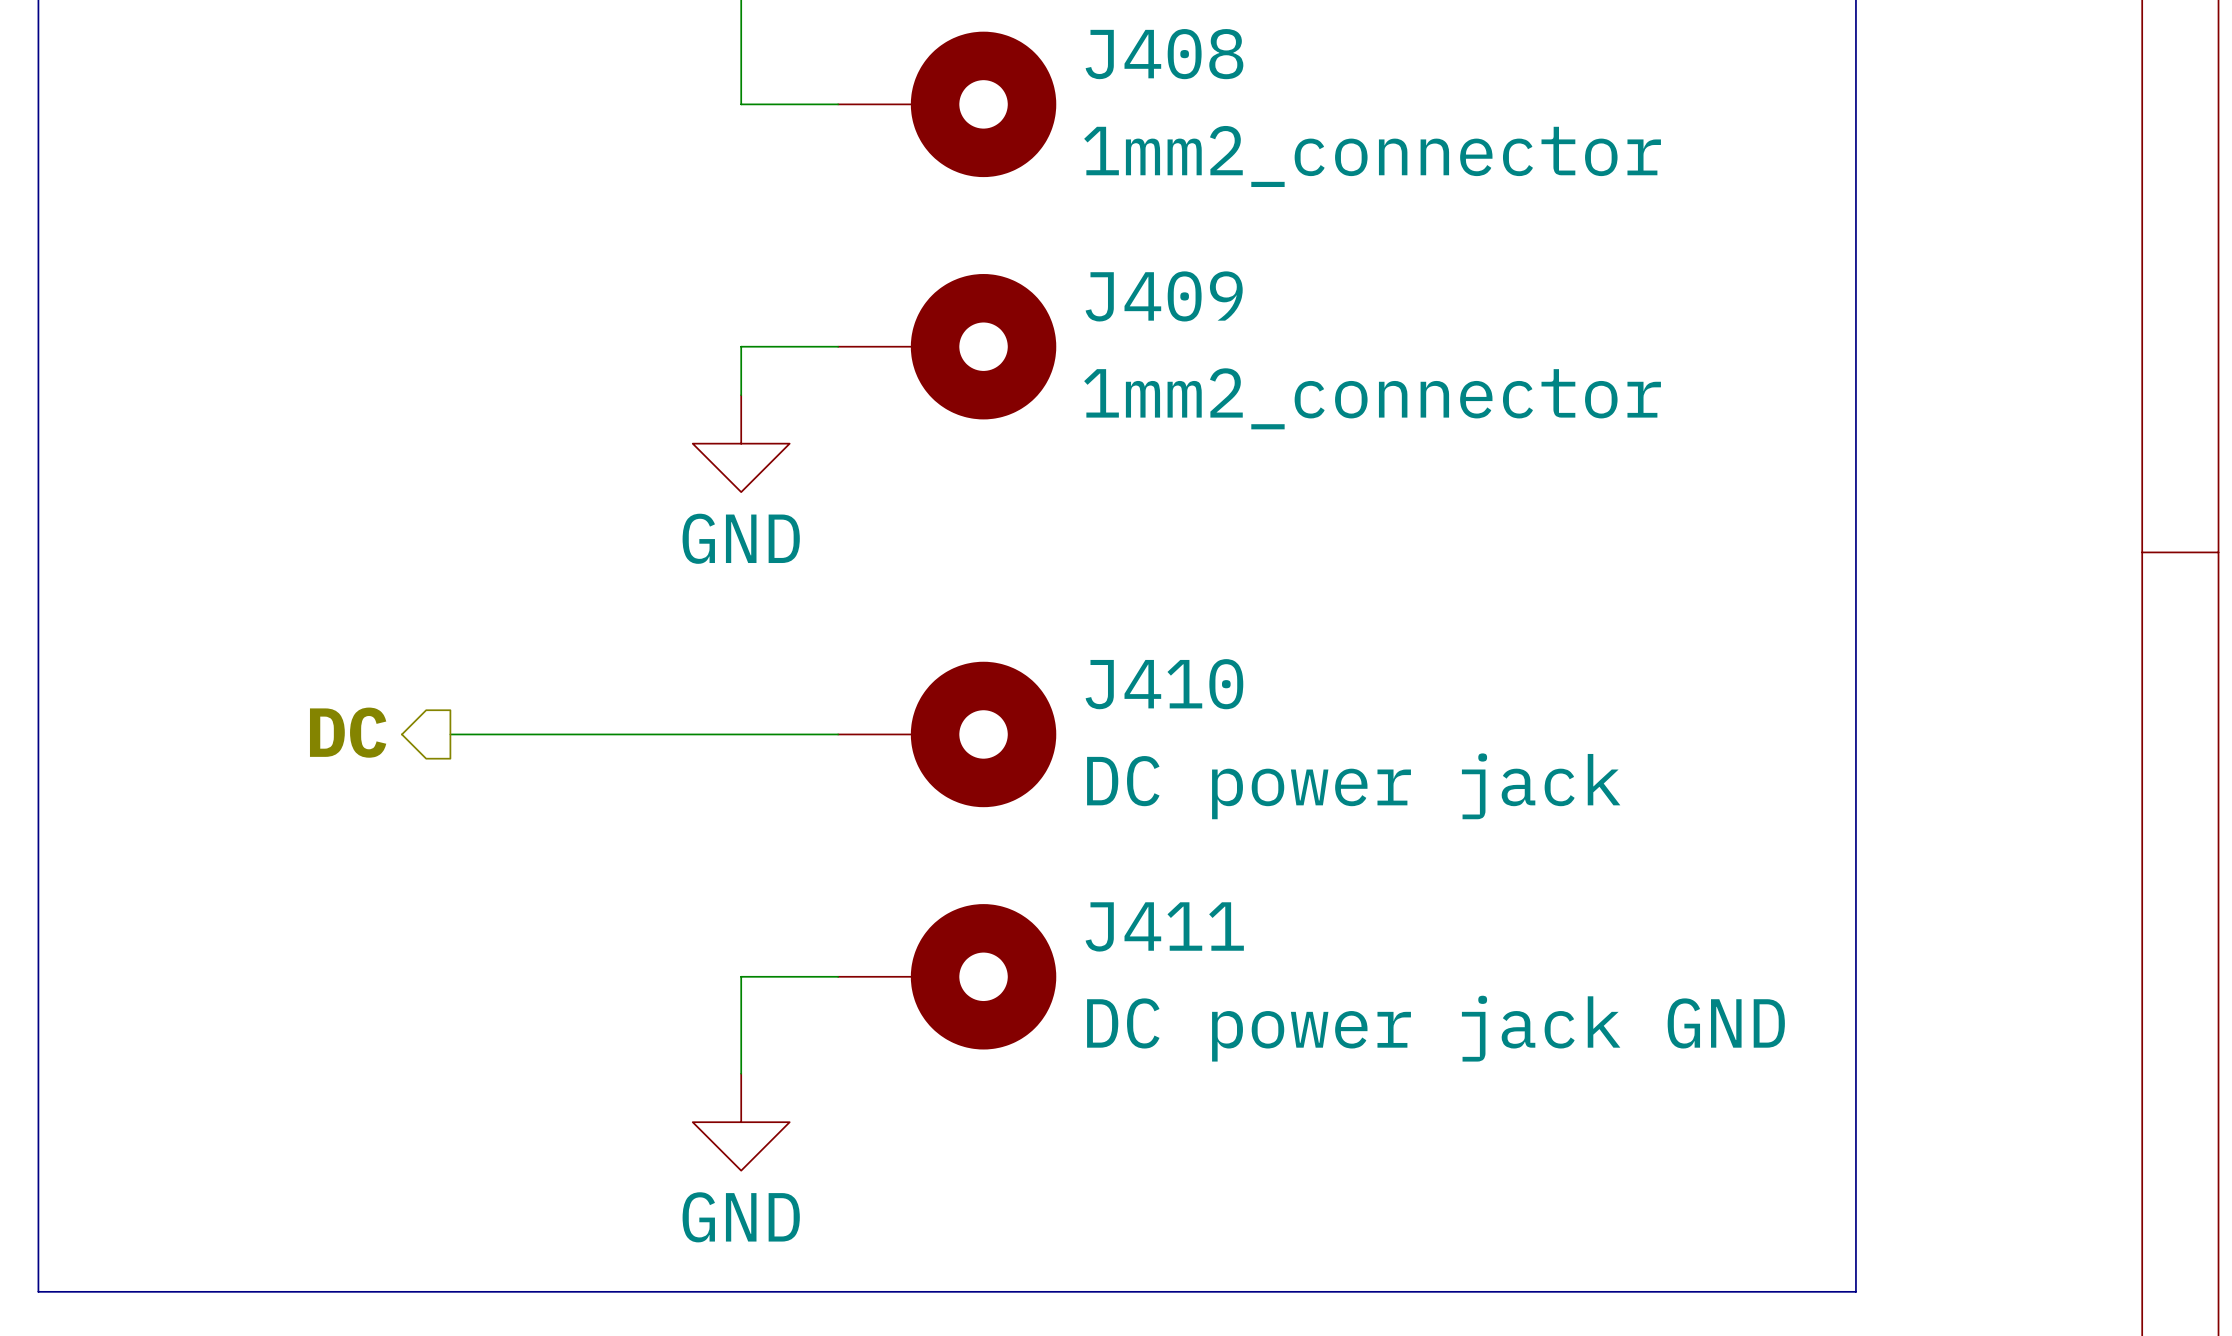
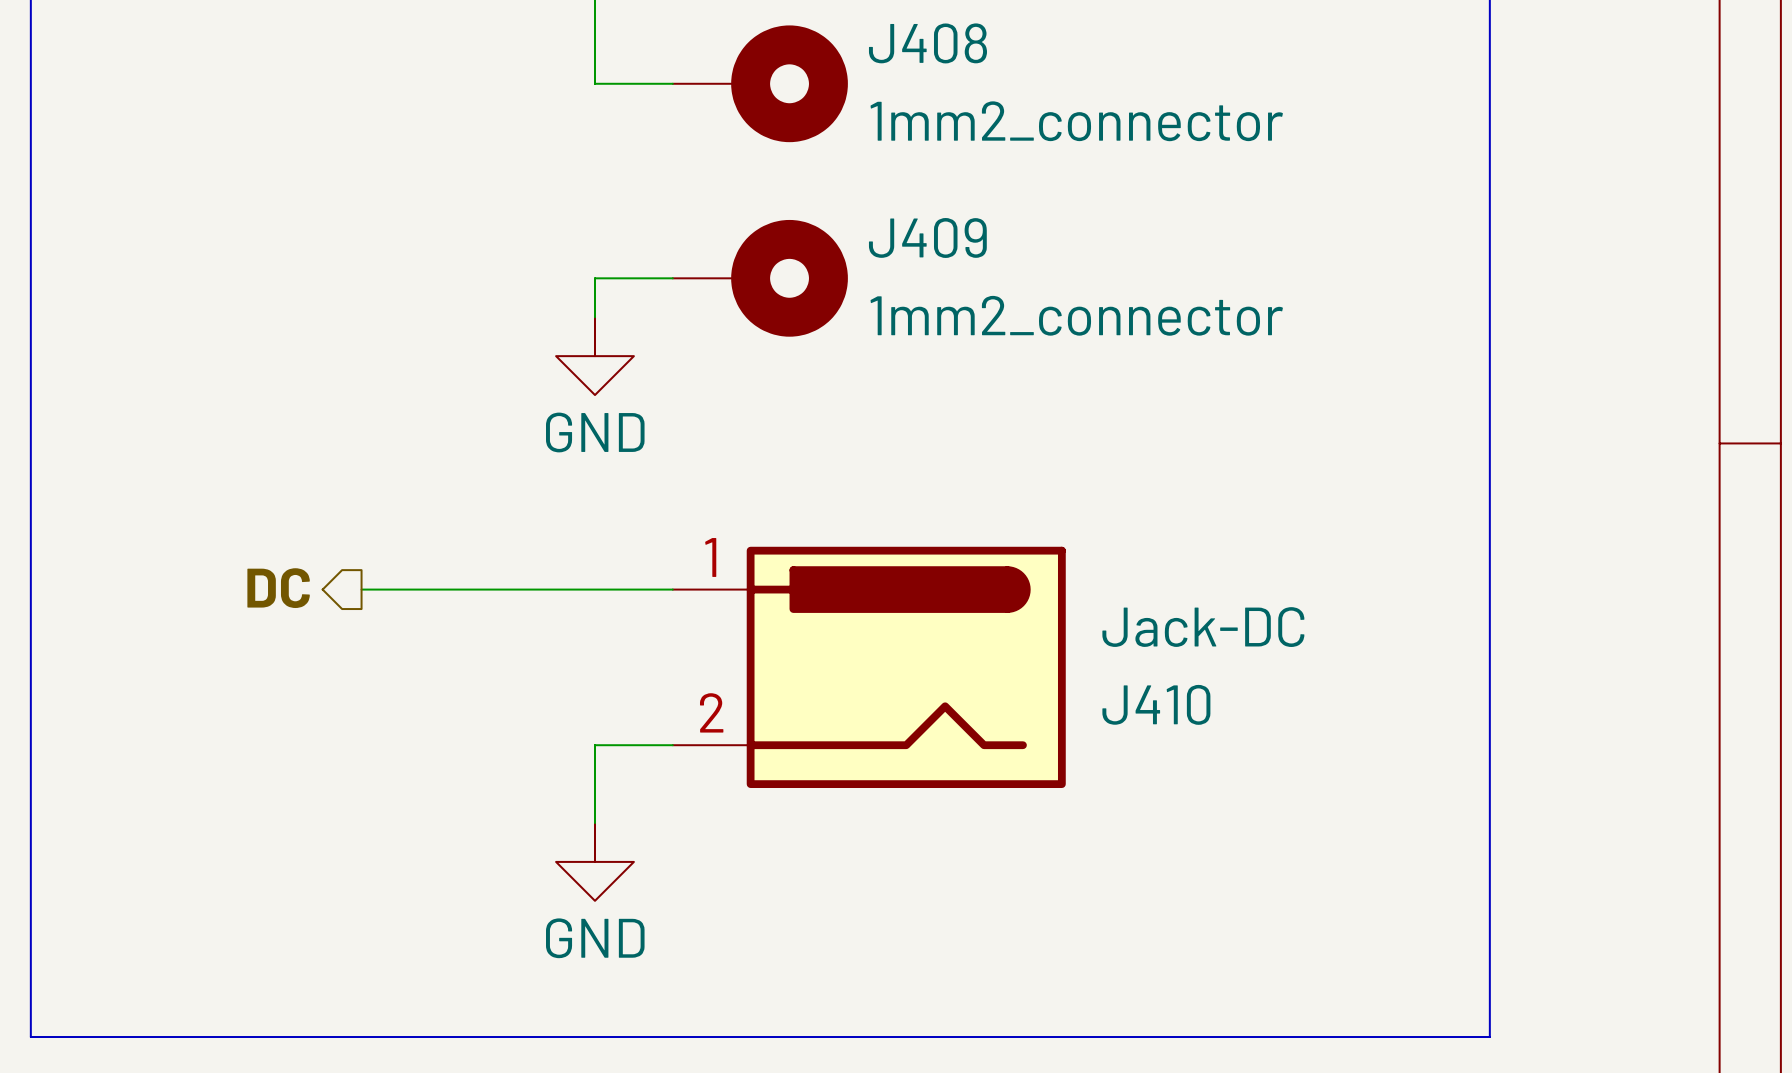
J410 symbol: [838, 661, 1057, 808] -> [672, 546, 1066, 789]
J410 name position: J410 (1164, 684) -> J410 (1156, 704)
J410 value: DC power jack (1353, 786) -> Jack-DC (1203, 627)
wire: (741, 976) (838, 976) -> (594, 784) (594, 745) (672, 745)
J411: DC power jack GND (947, 976) -> none
power symbol position: GND (741, 1122) -> GND (594, 861)

